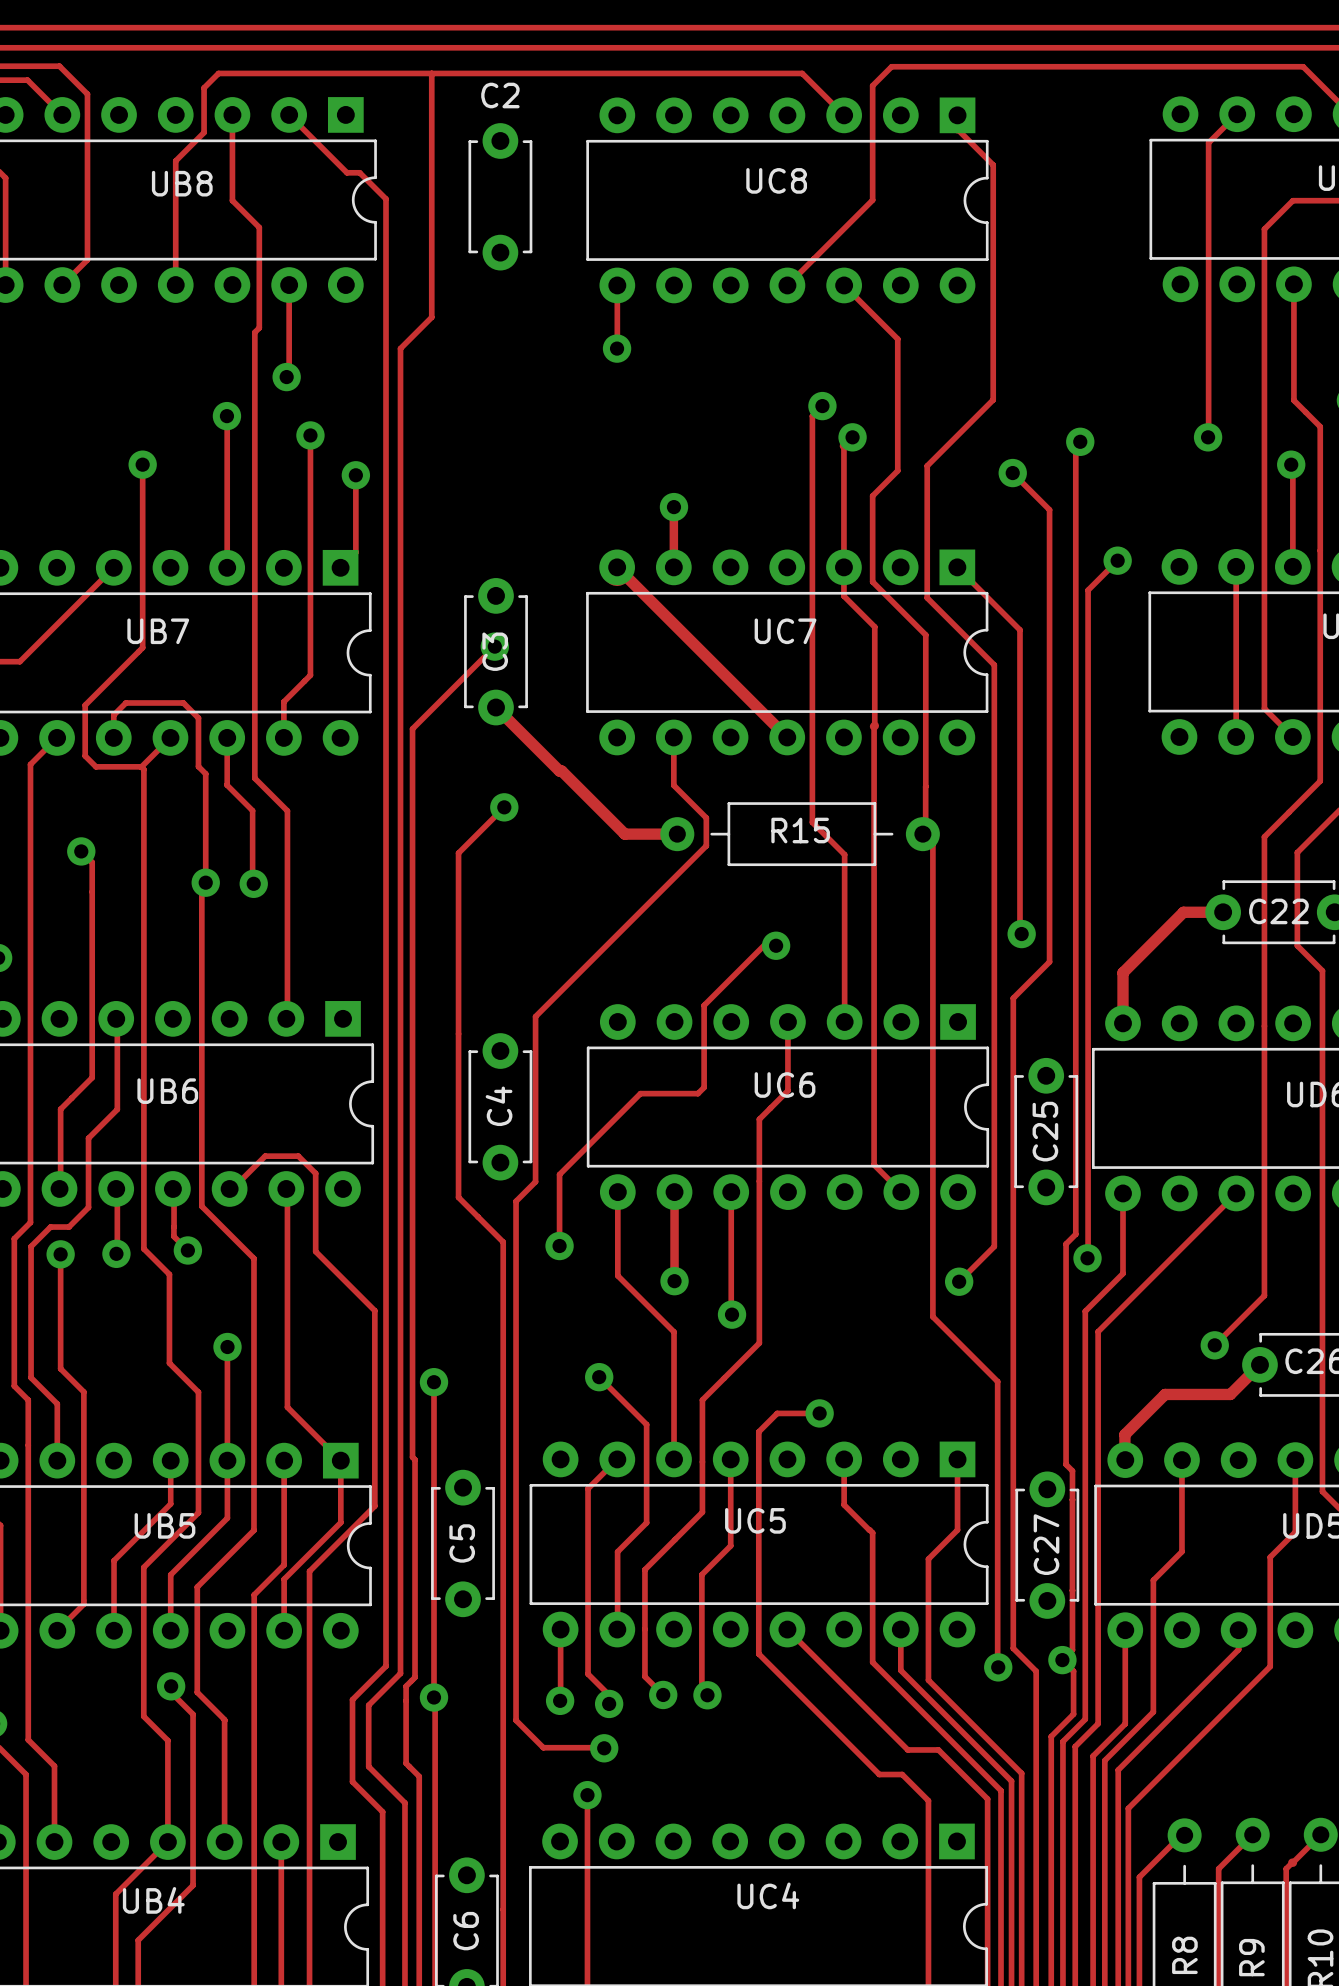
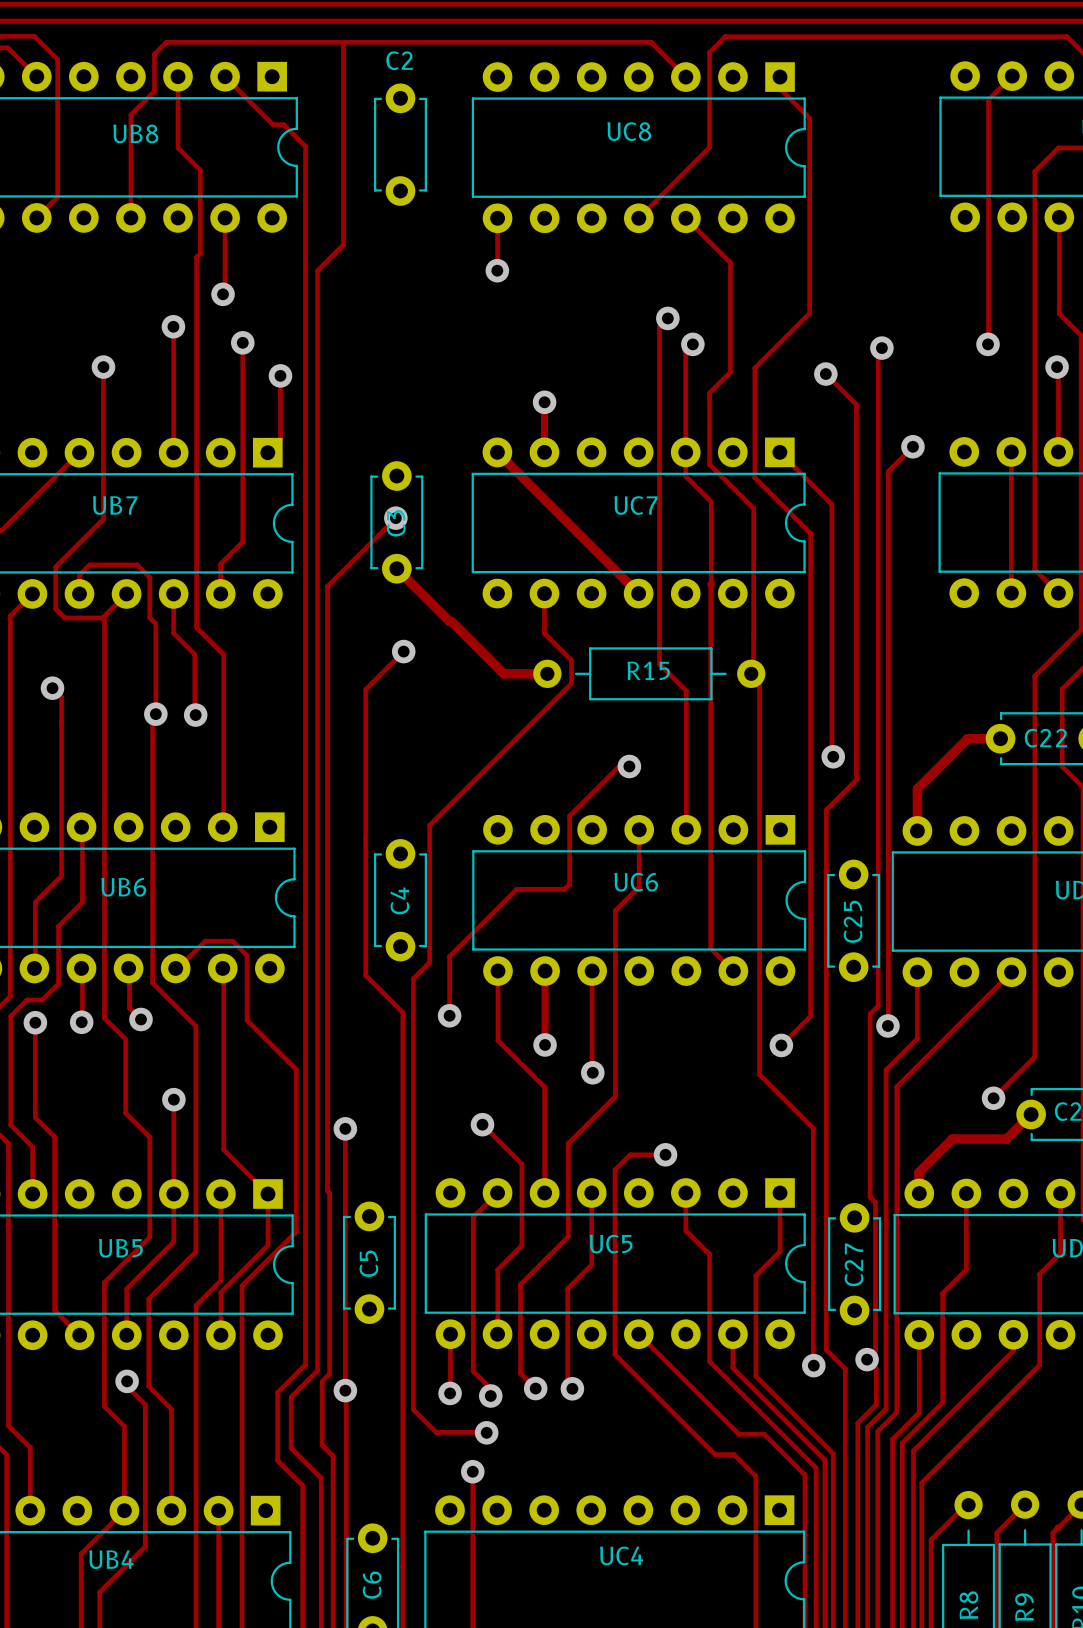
track: (170, 1460) (170, 1503) (114, 1560) (114, 1630) -> none
track: (83, 1600) (83, 1604) (57, 1630) -> (54, 1310) (79, 1335)

